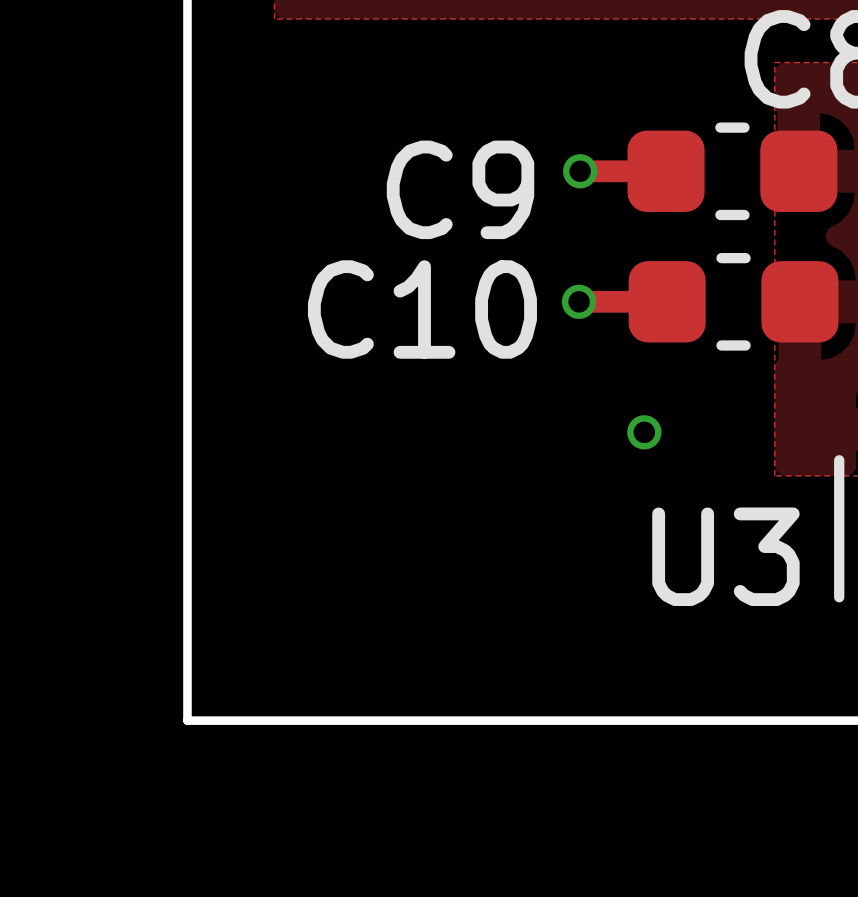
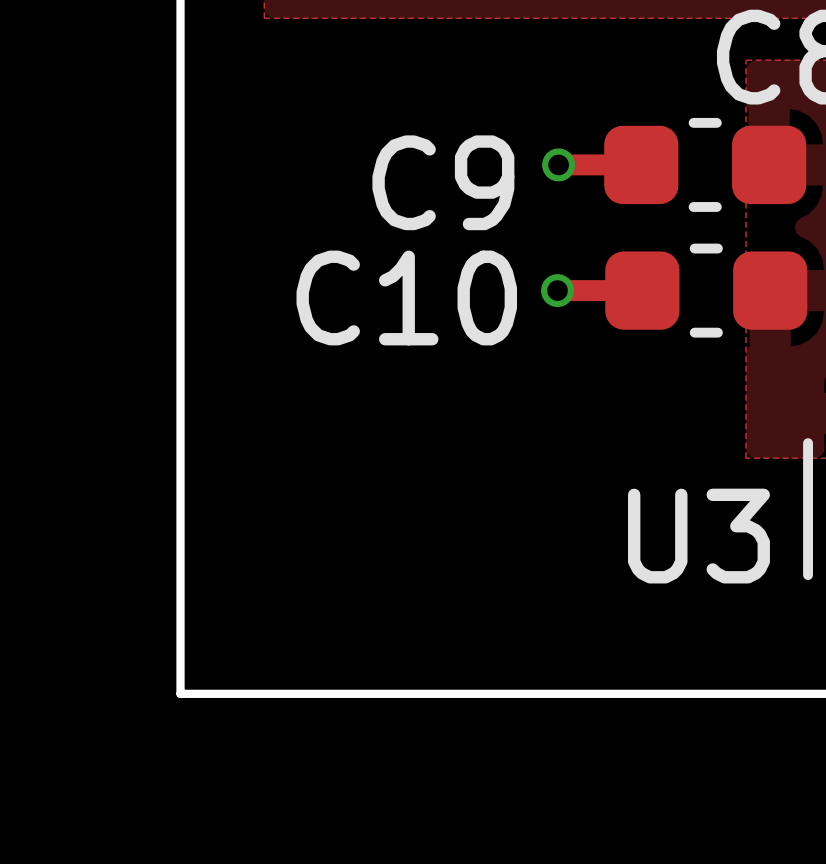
via: (644, 432) -> none

